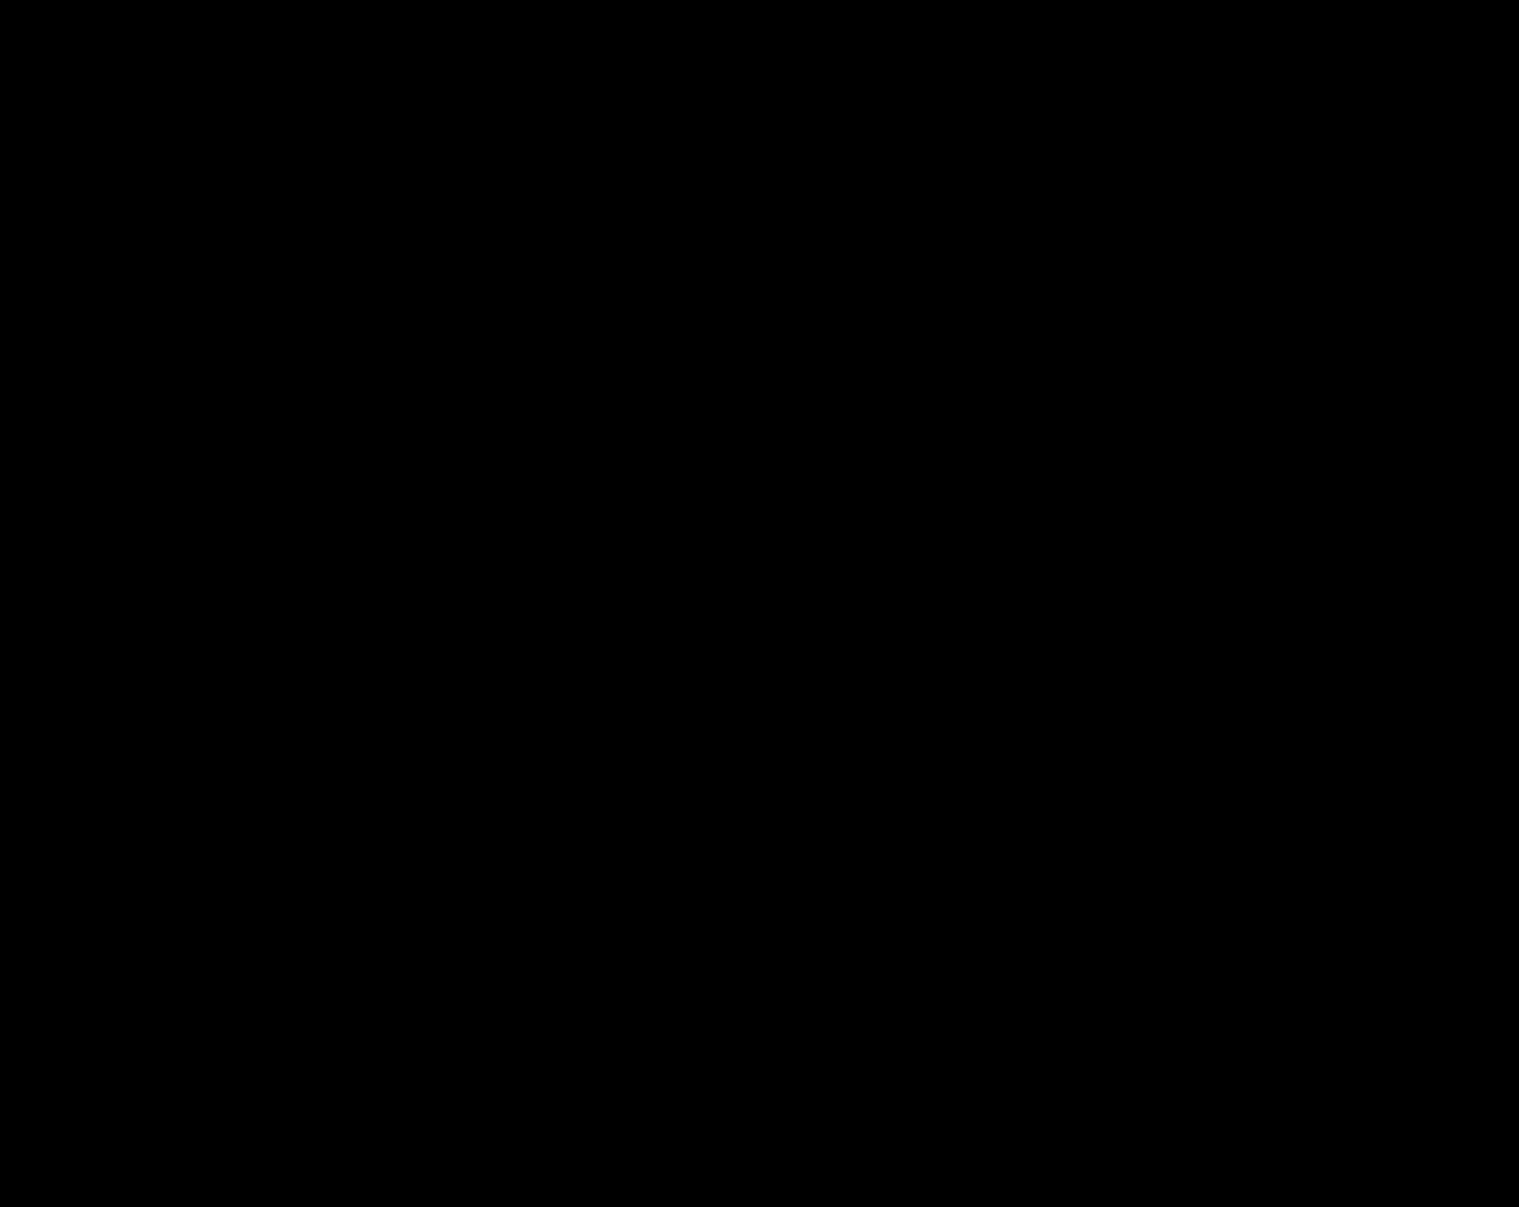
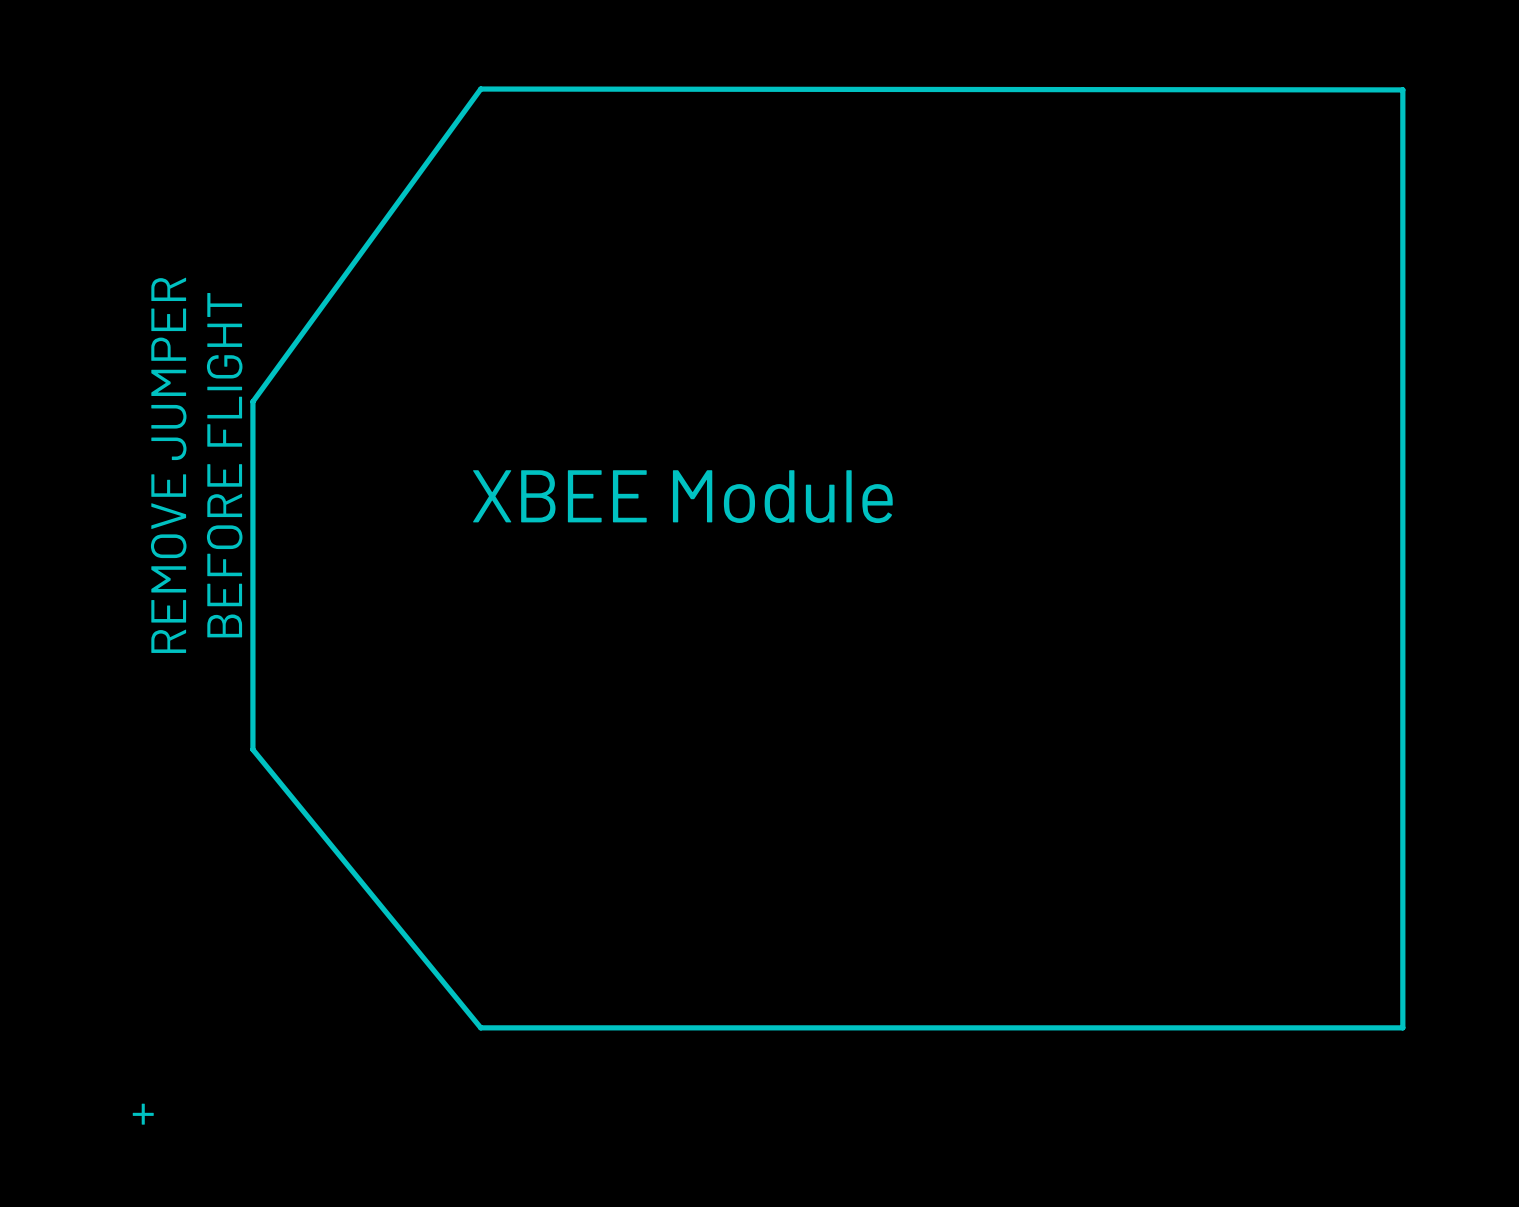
line: none -> (480, 89) (1402, 89) (1402, 1027) (480, 1027) (252, 749) (252, 401) (480, 89)
text: none -> REMOVE JUMPER (168, 465)
text: none -> BEFORE FLIGHT (224, 465)
text: none -> XBEE Module (682, 496)
text: none -> + (143, 1114)

